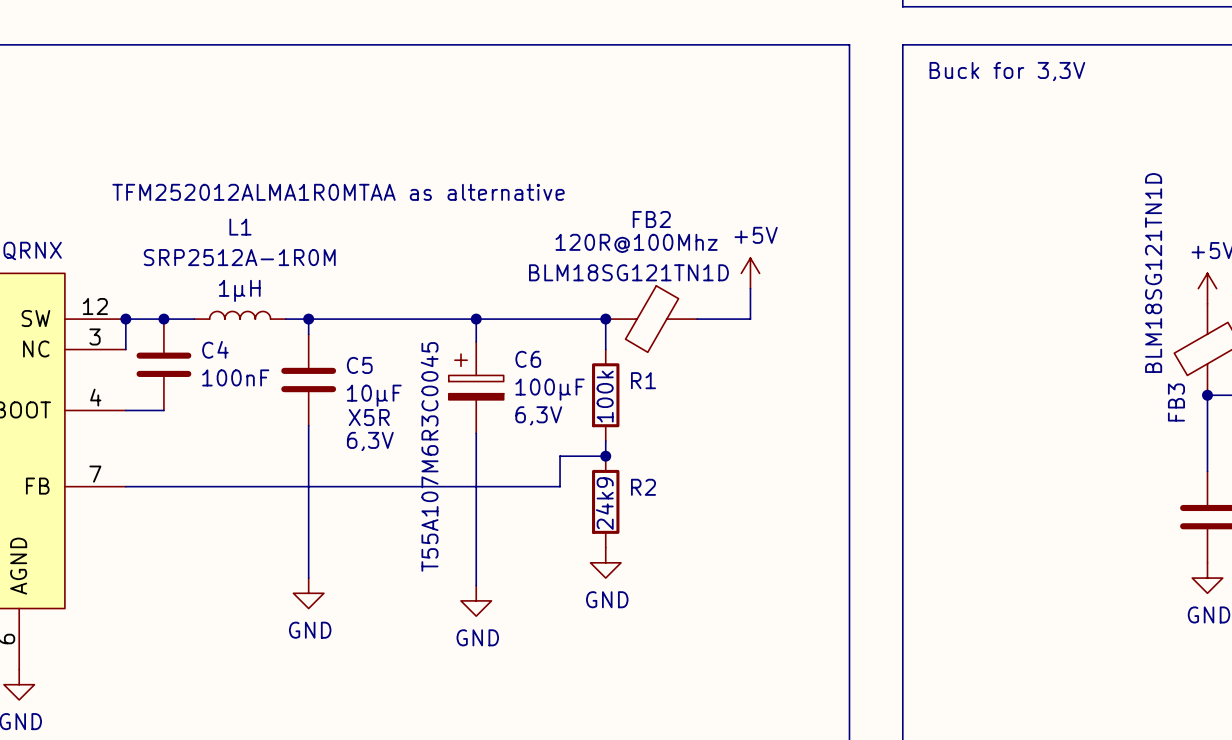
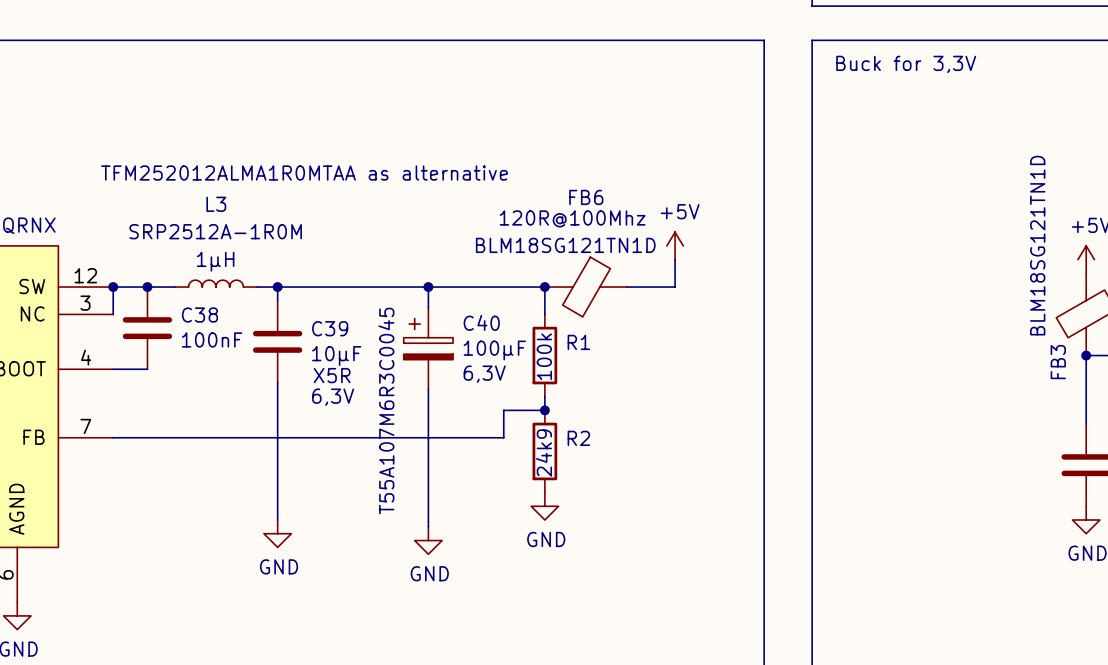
FB2 name: FB2 (651, 219) -> FB6 (586, 197)
L1 name: L1 (240, 227) -> L3 (216, 204)
C4 name: C4 (215, 349) -> C38 (199, 315)
C6 name: C6 (528, 359) -> C40 (481, 322)
C5 name: C5 (359, 365) -> C39 (330, 328)

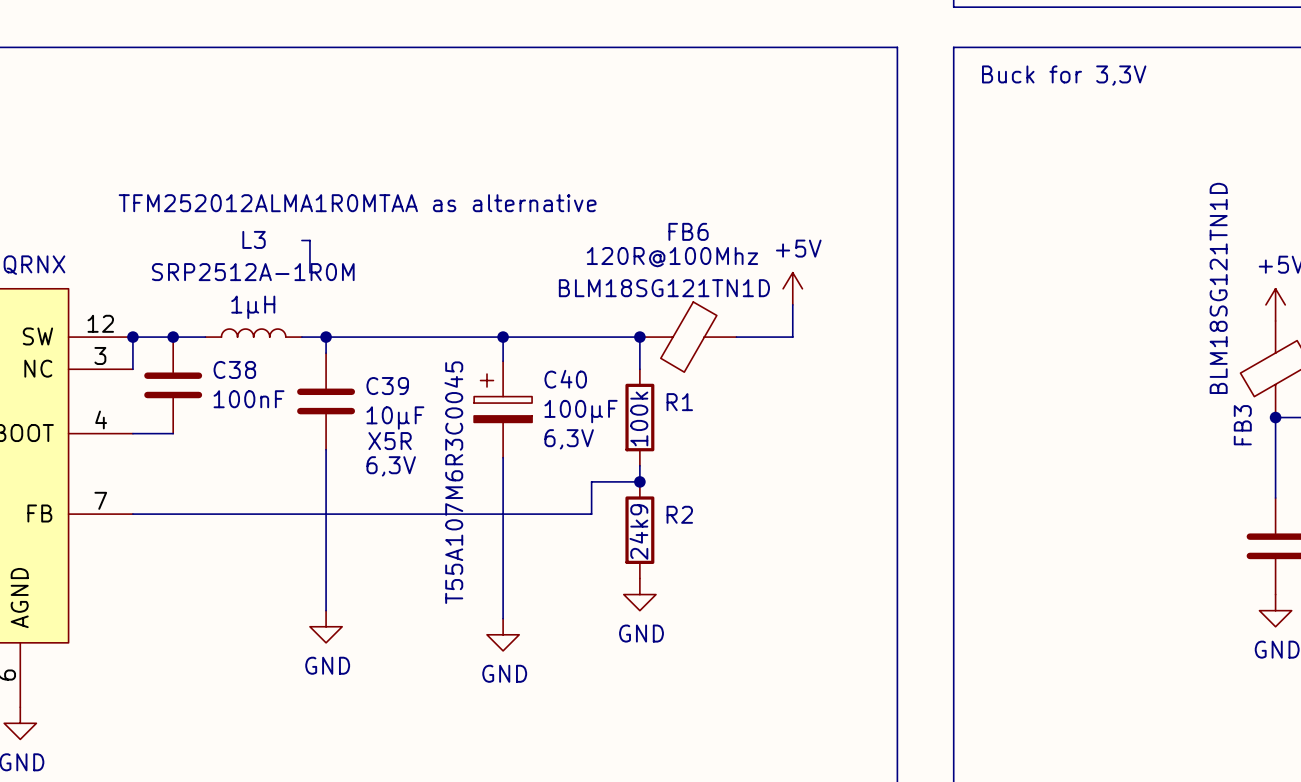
line: none -> (301, 240) (309, 240) (309, 272)

